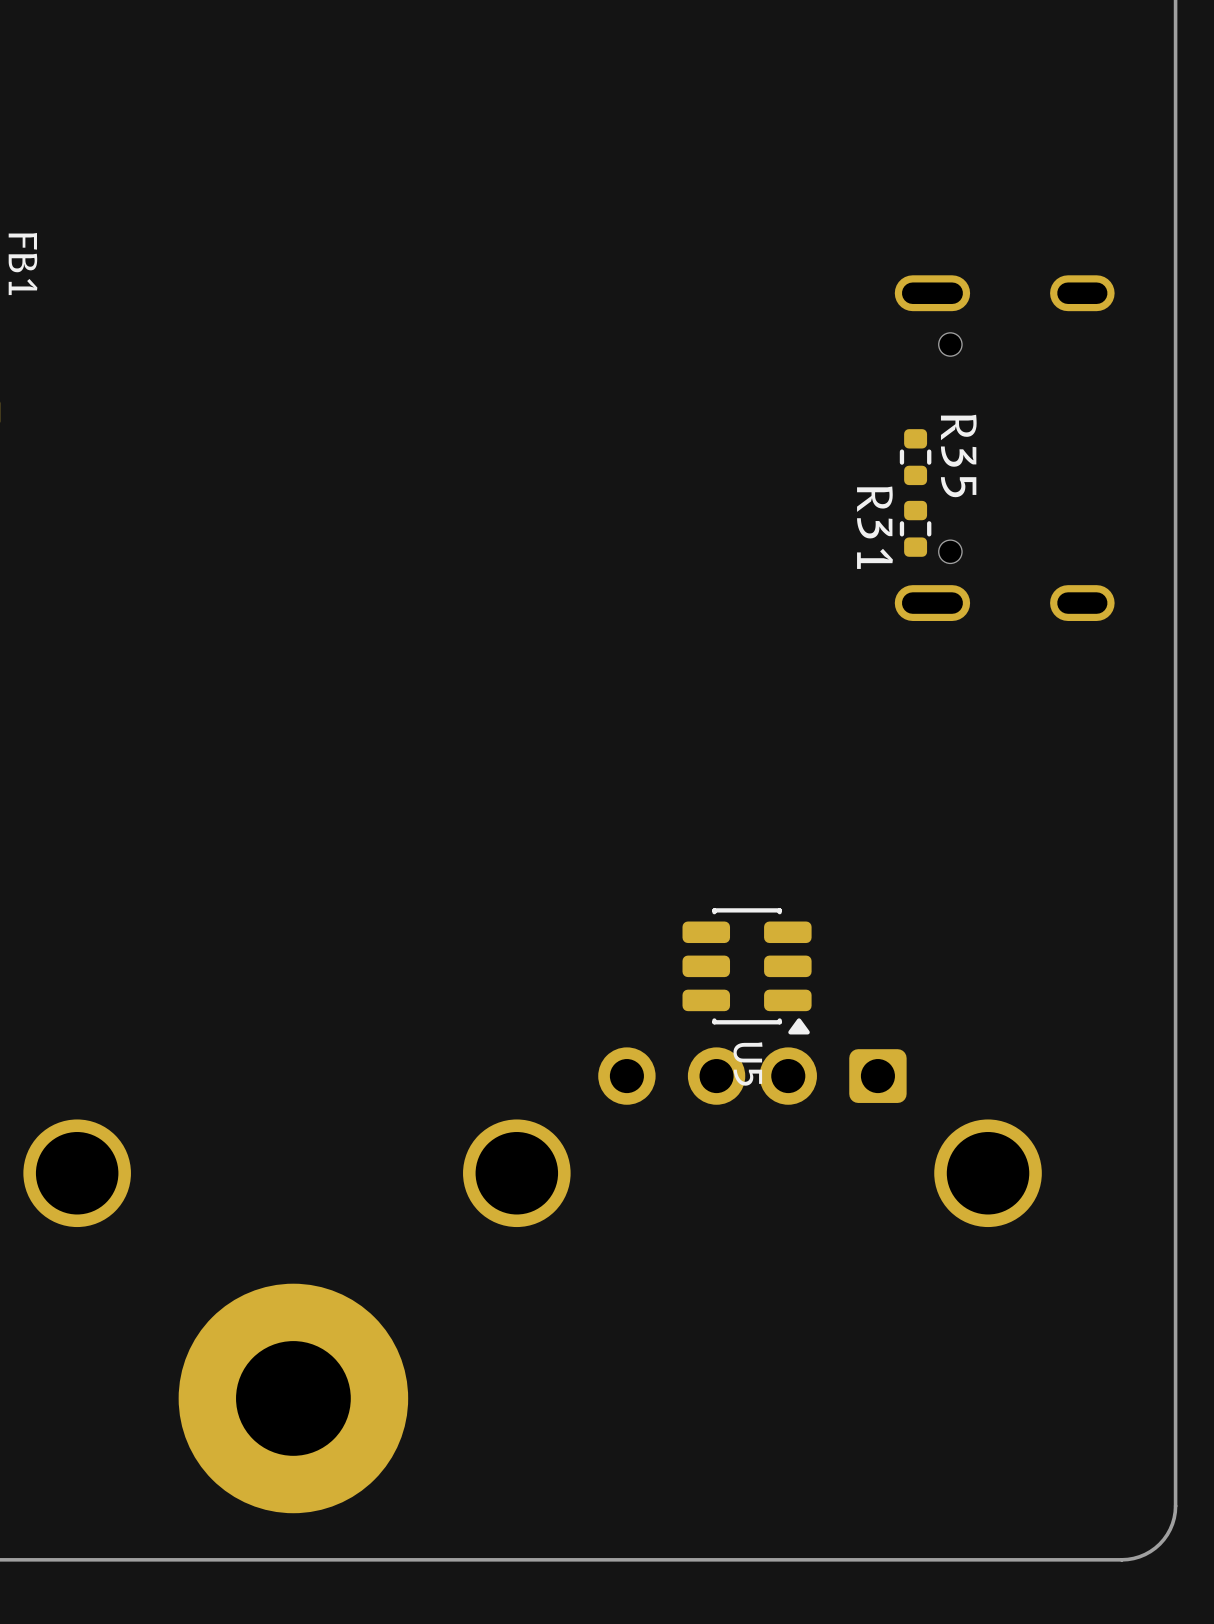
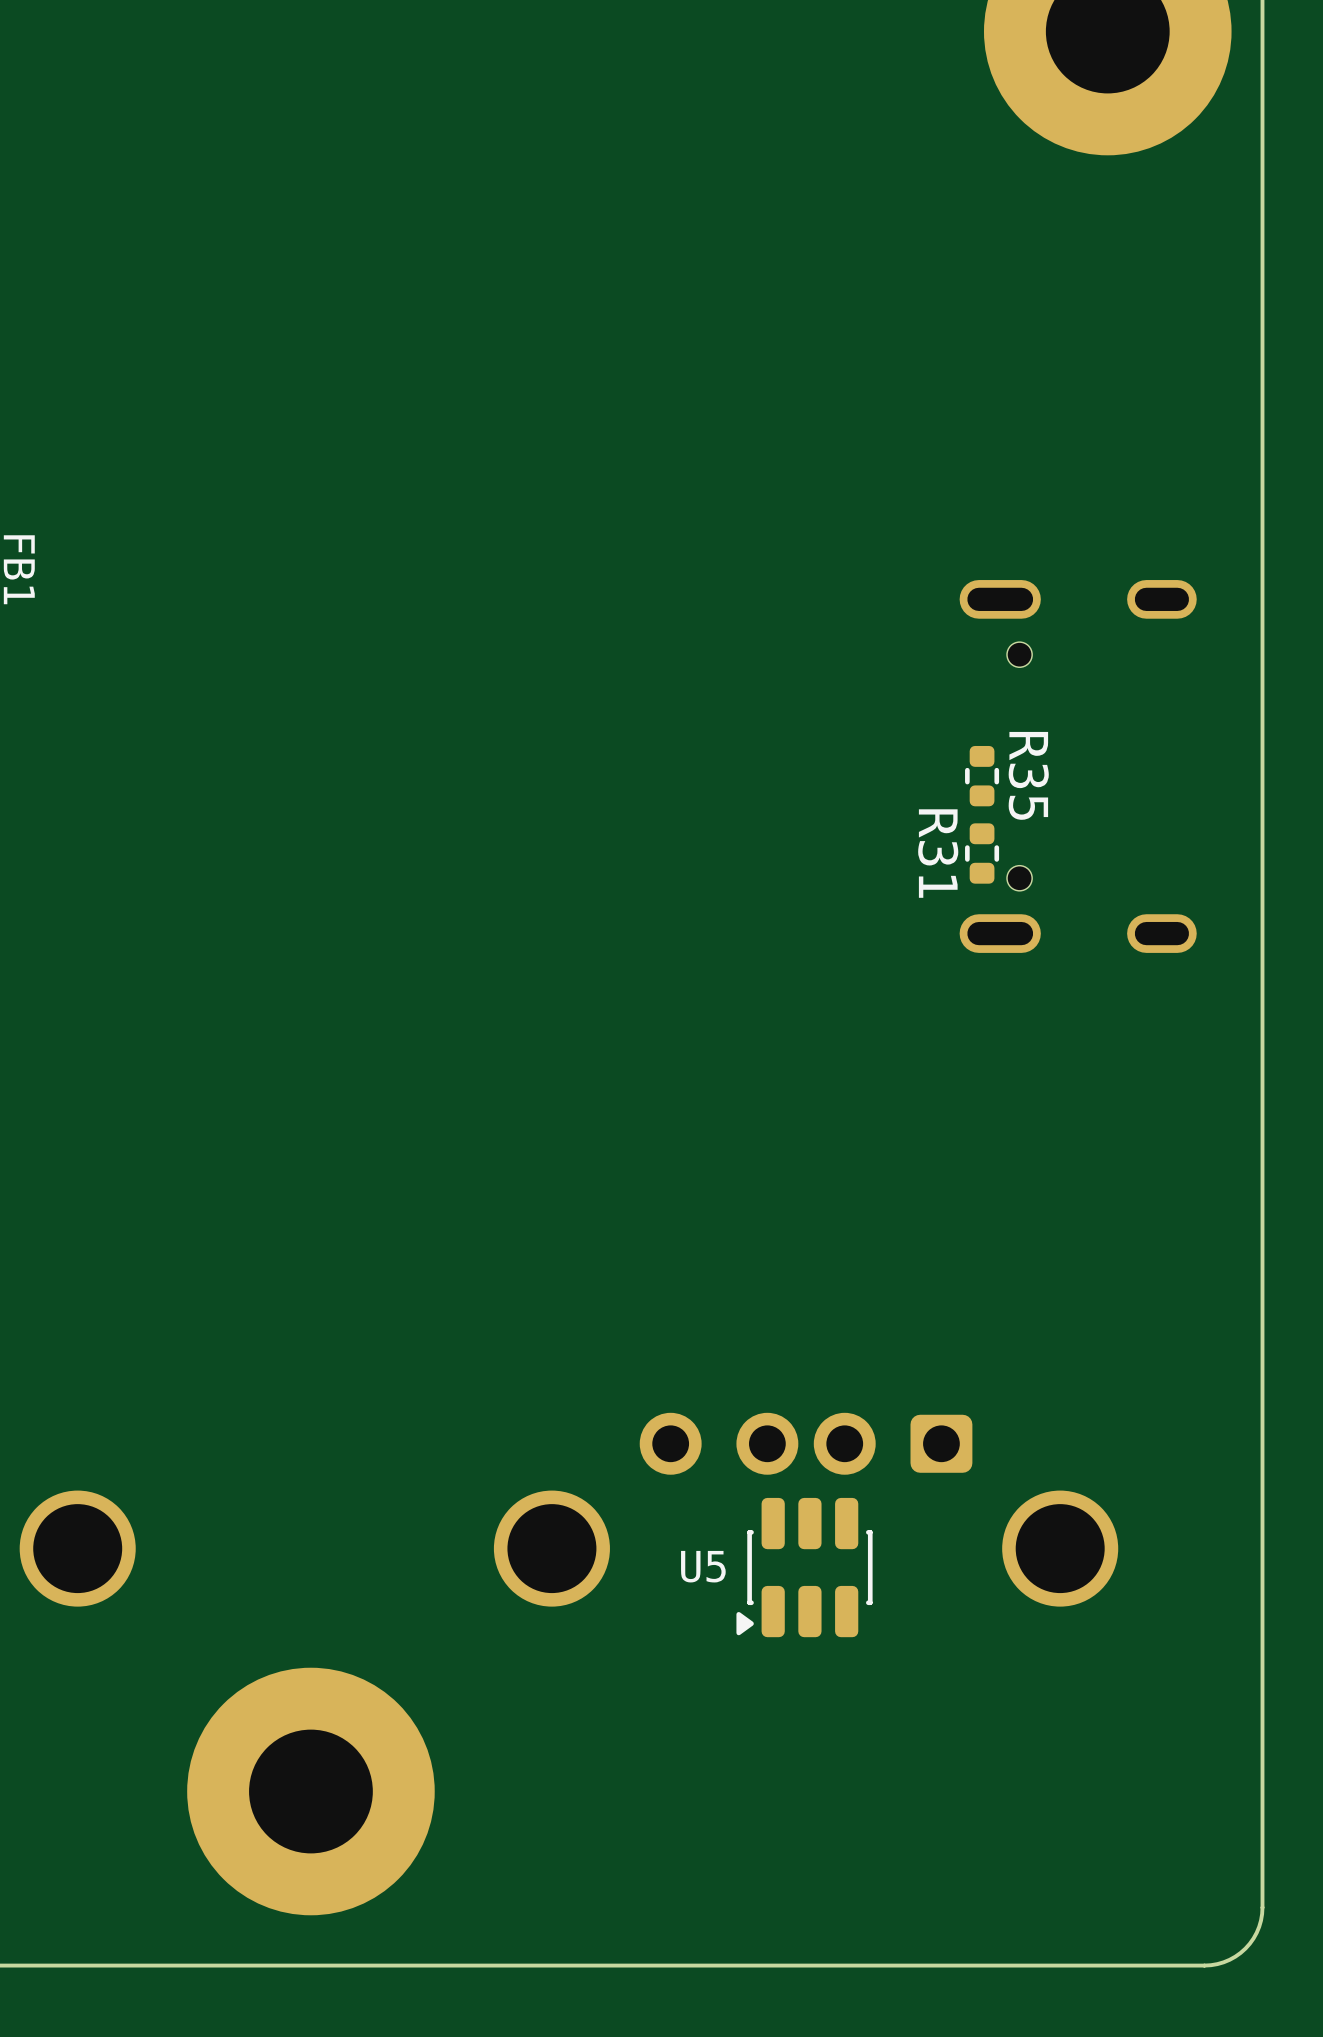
U5 rotation: 0° (747, 971) -> 90° clockwise (804, 1567)
U5 position: (747, 971) -> (804, 1567)

